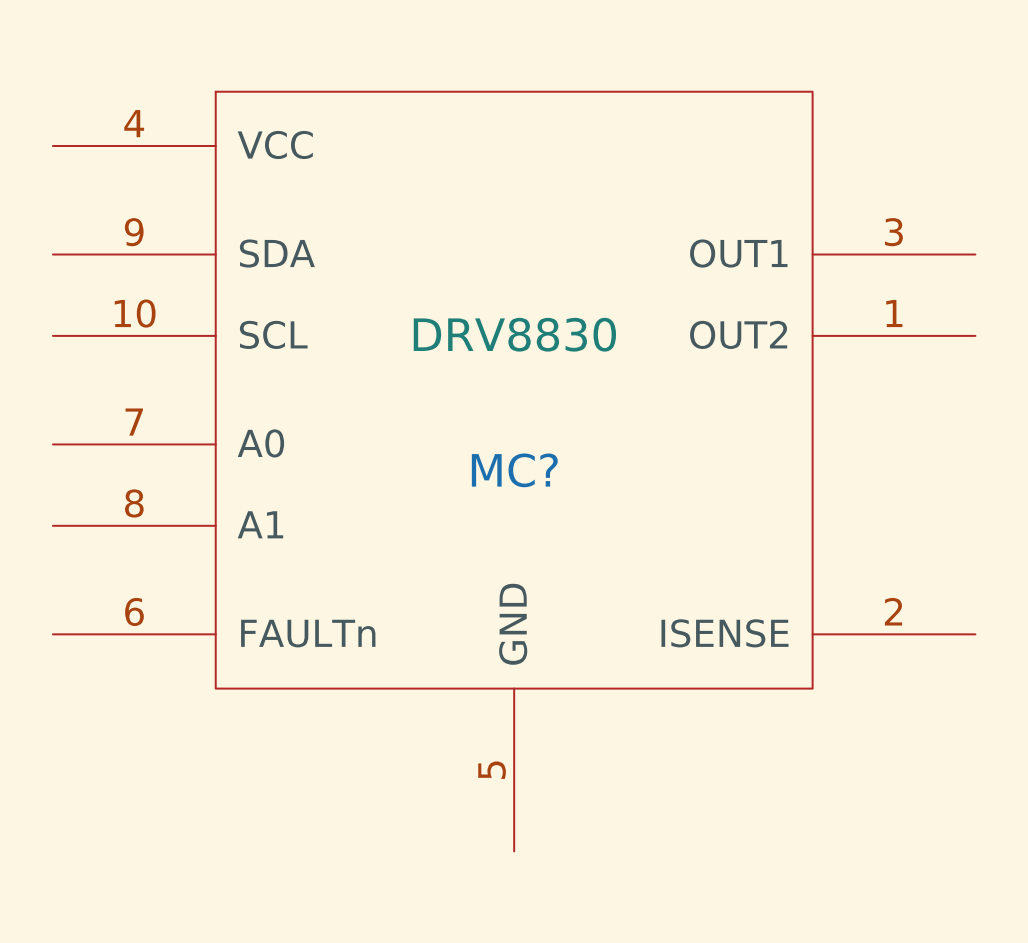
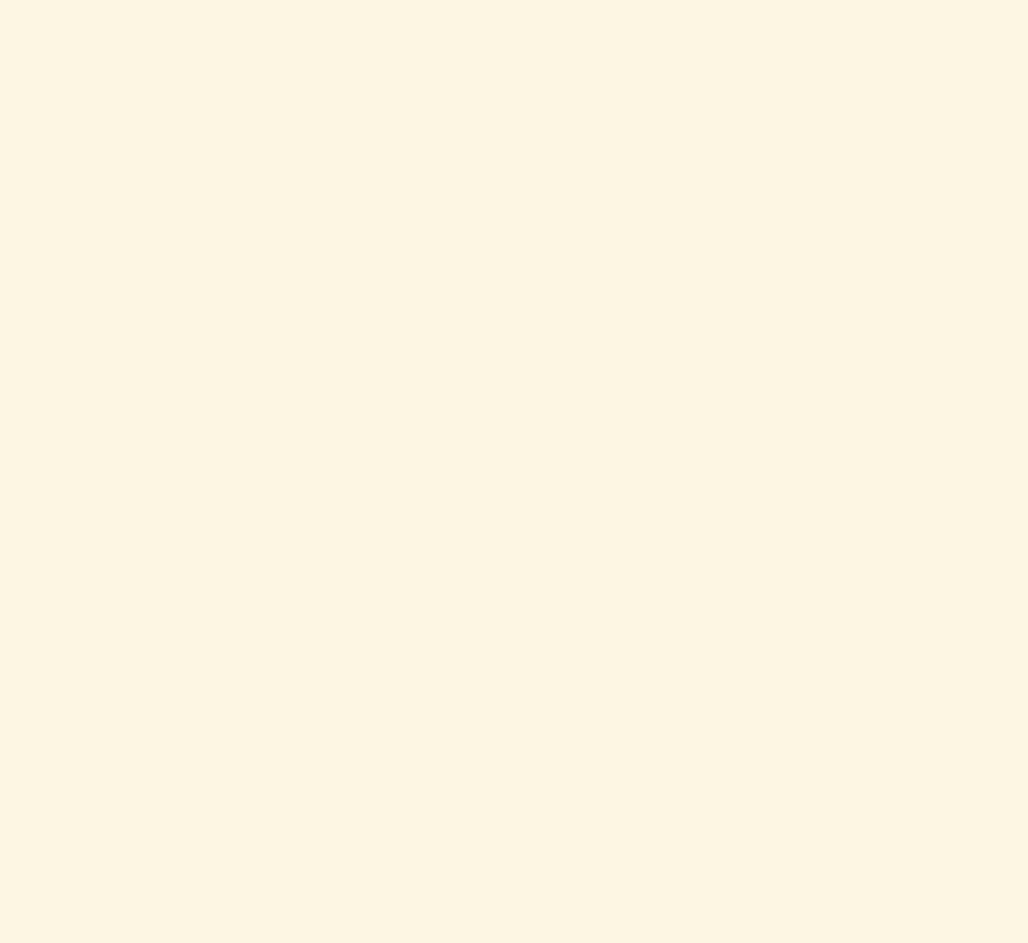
MC?: DRV8830 (514, 471) -> none

